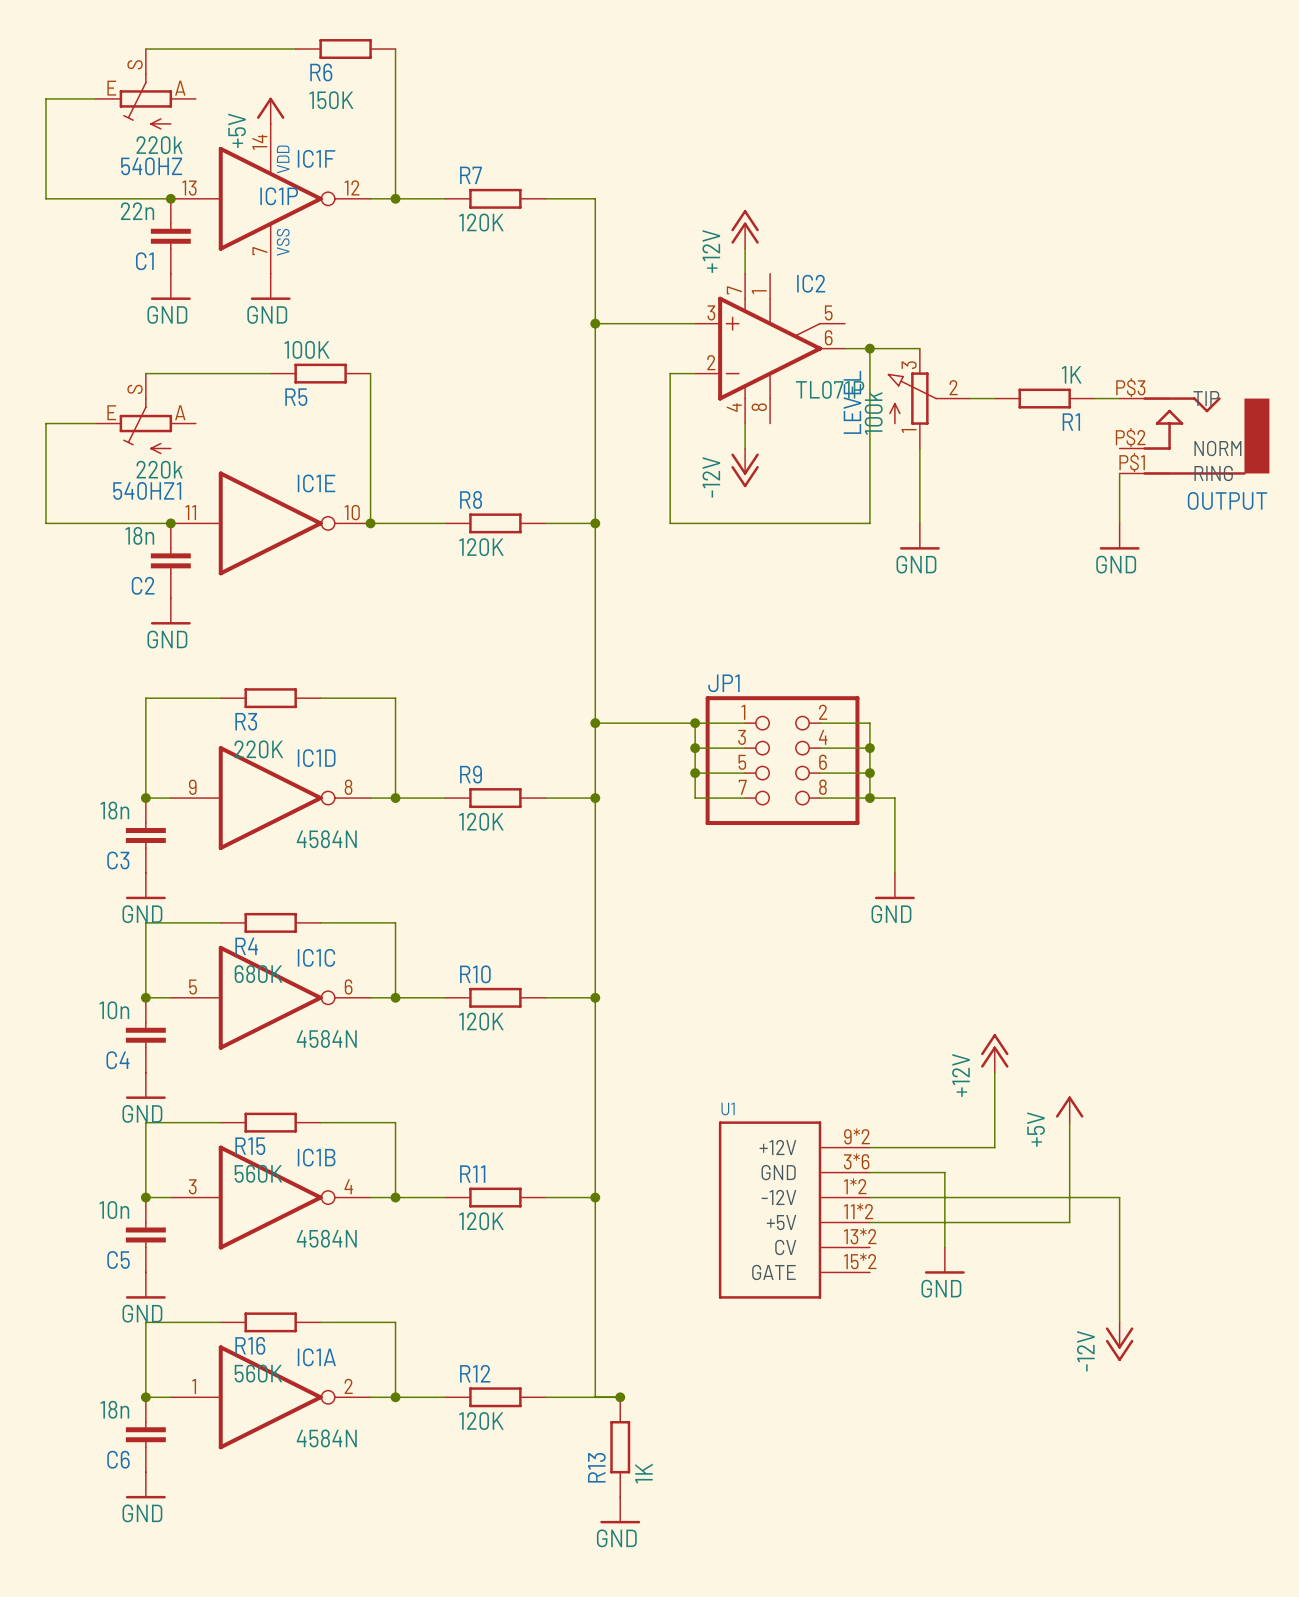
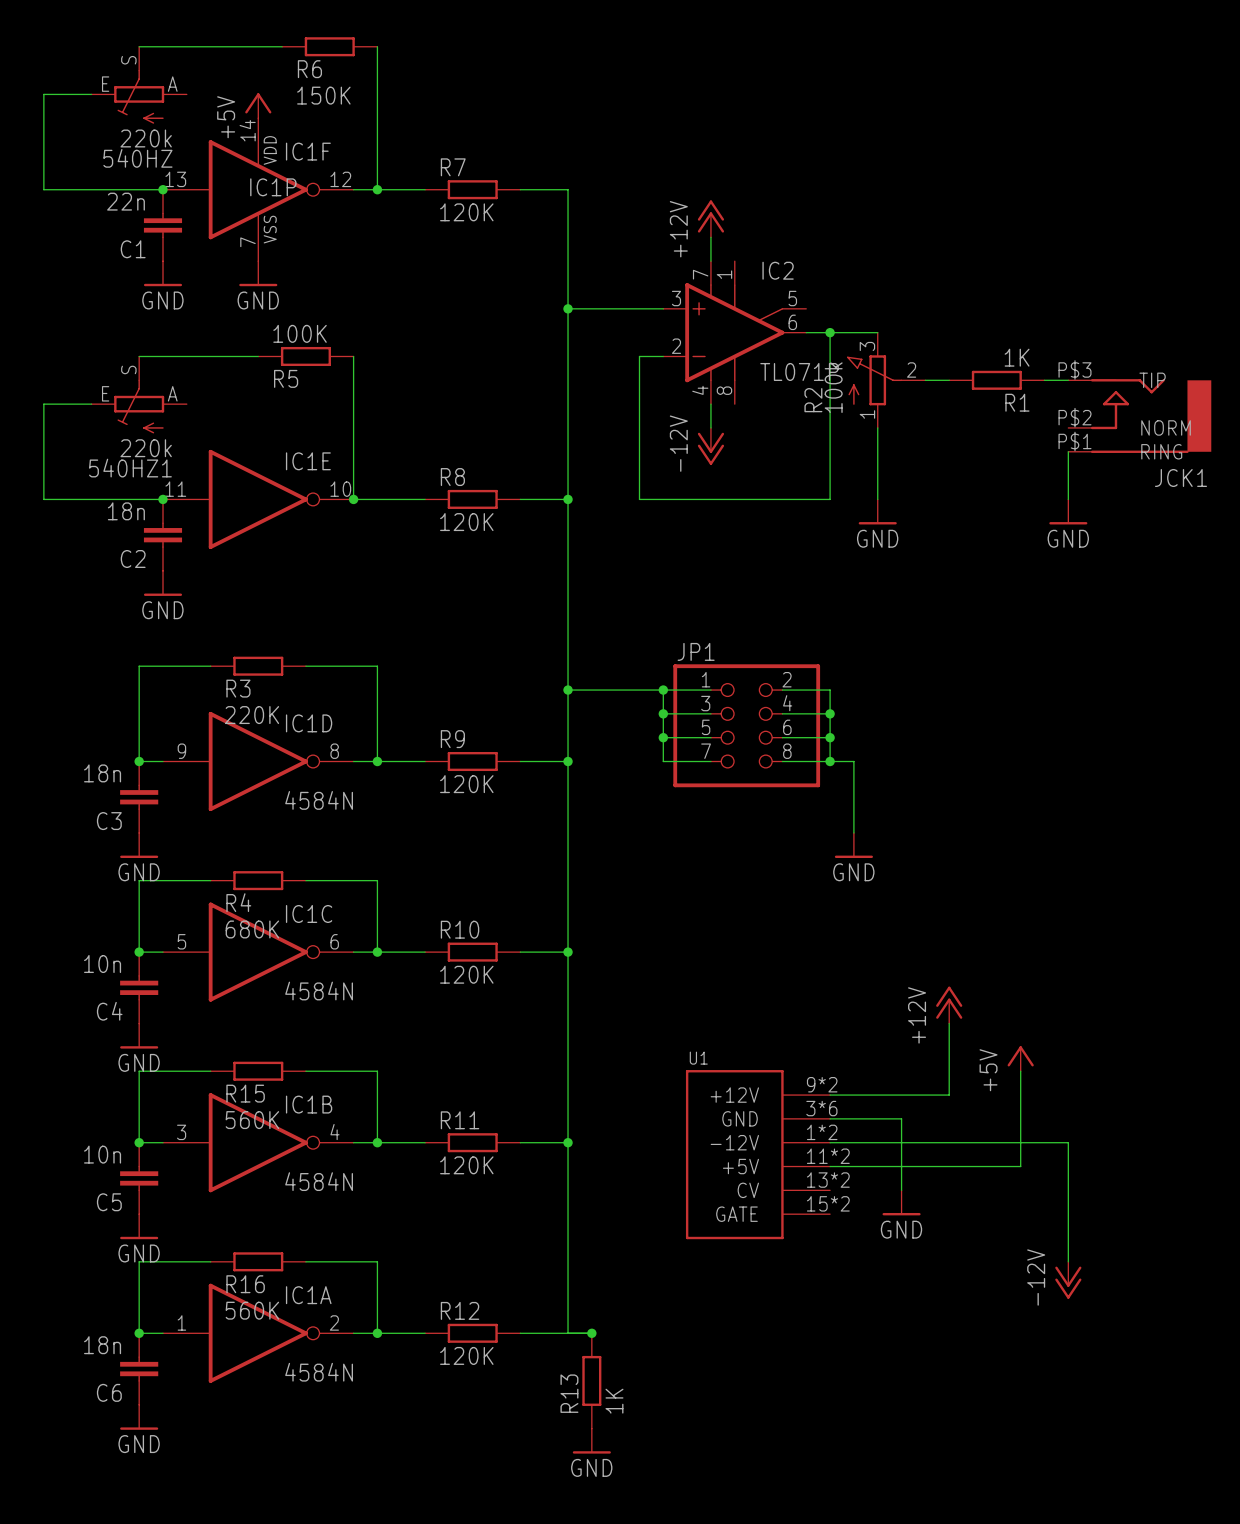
LEVEL name: LEVEL (852, 402) -> R2 (813, 400)
OUTPUT name: OUTPUT (1227, 500) -> JCK1 (1180, 477)

